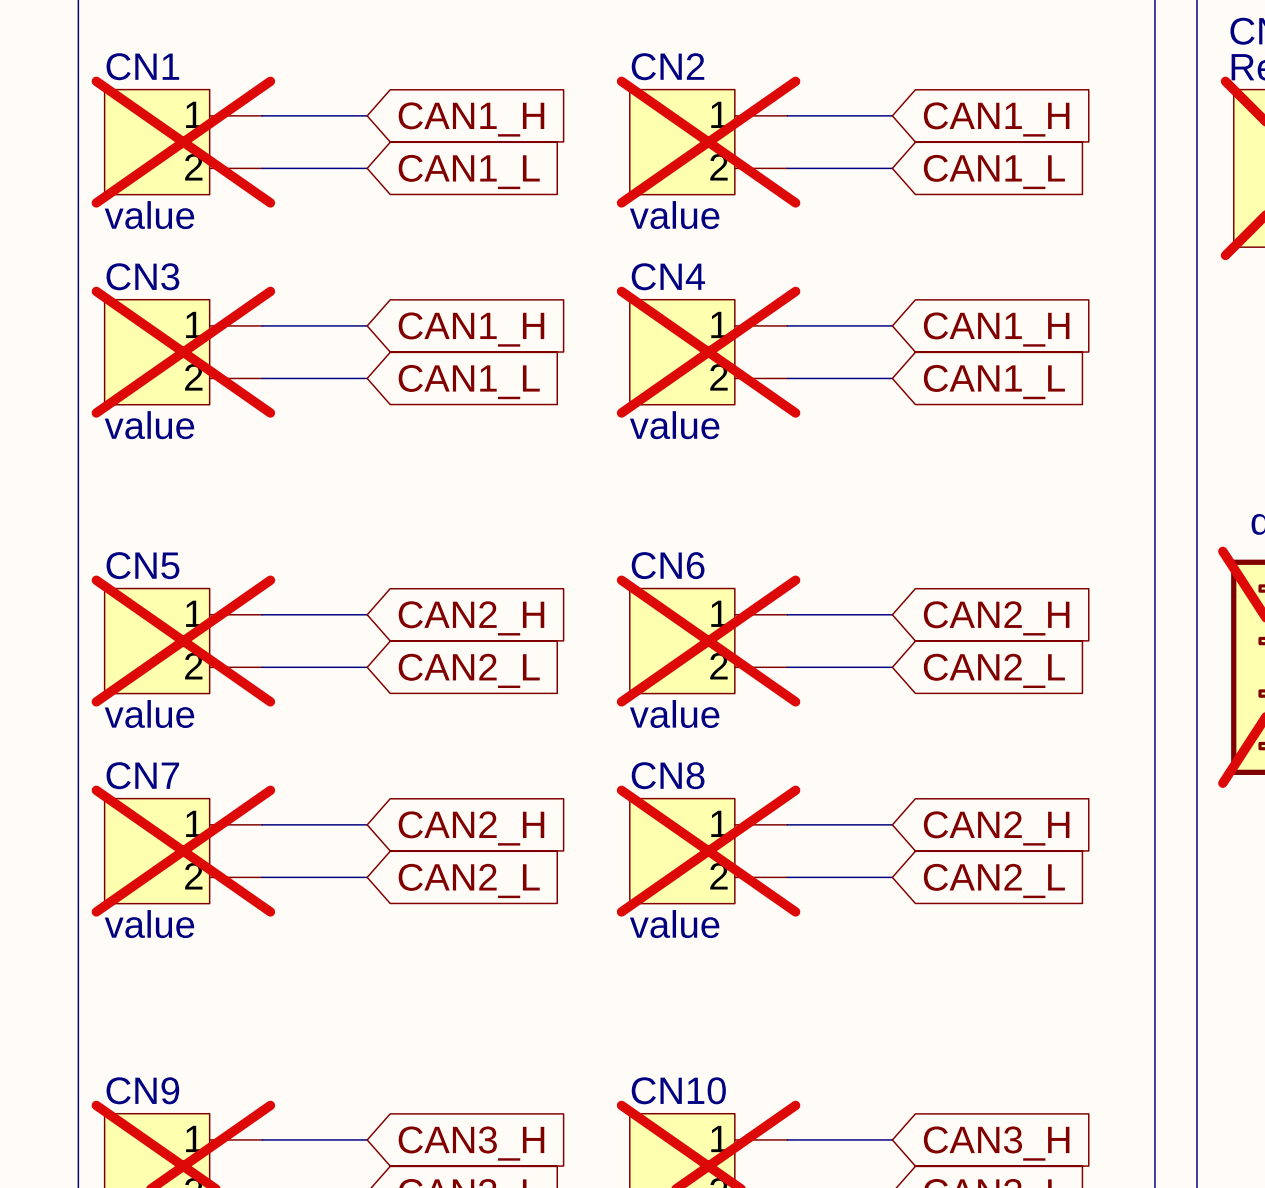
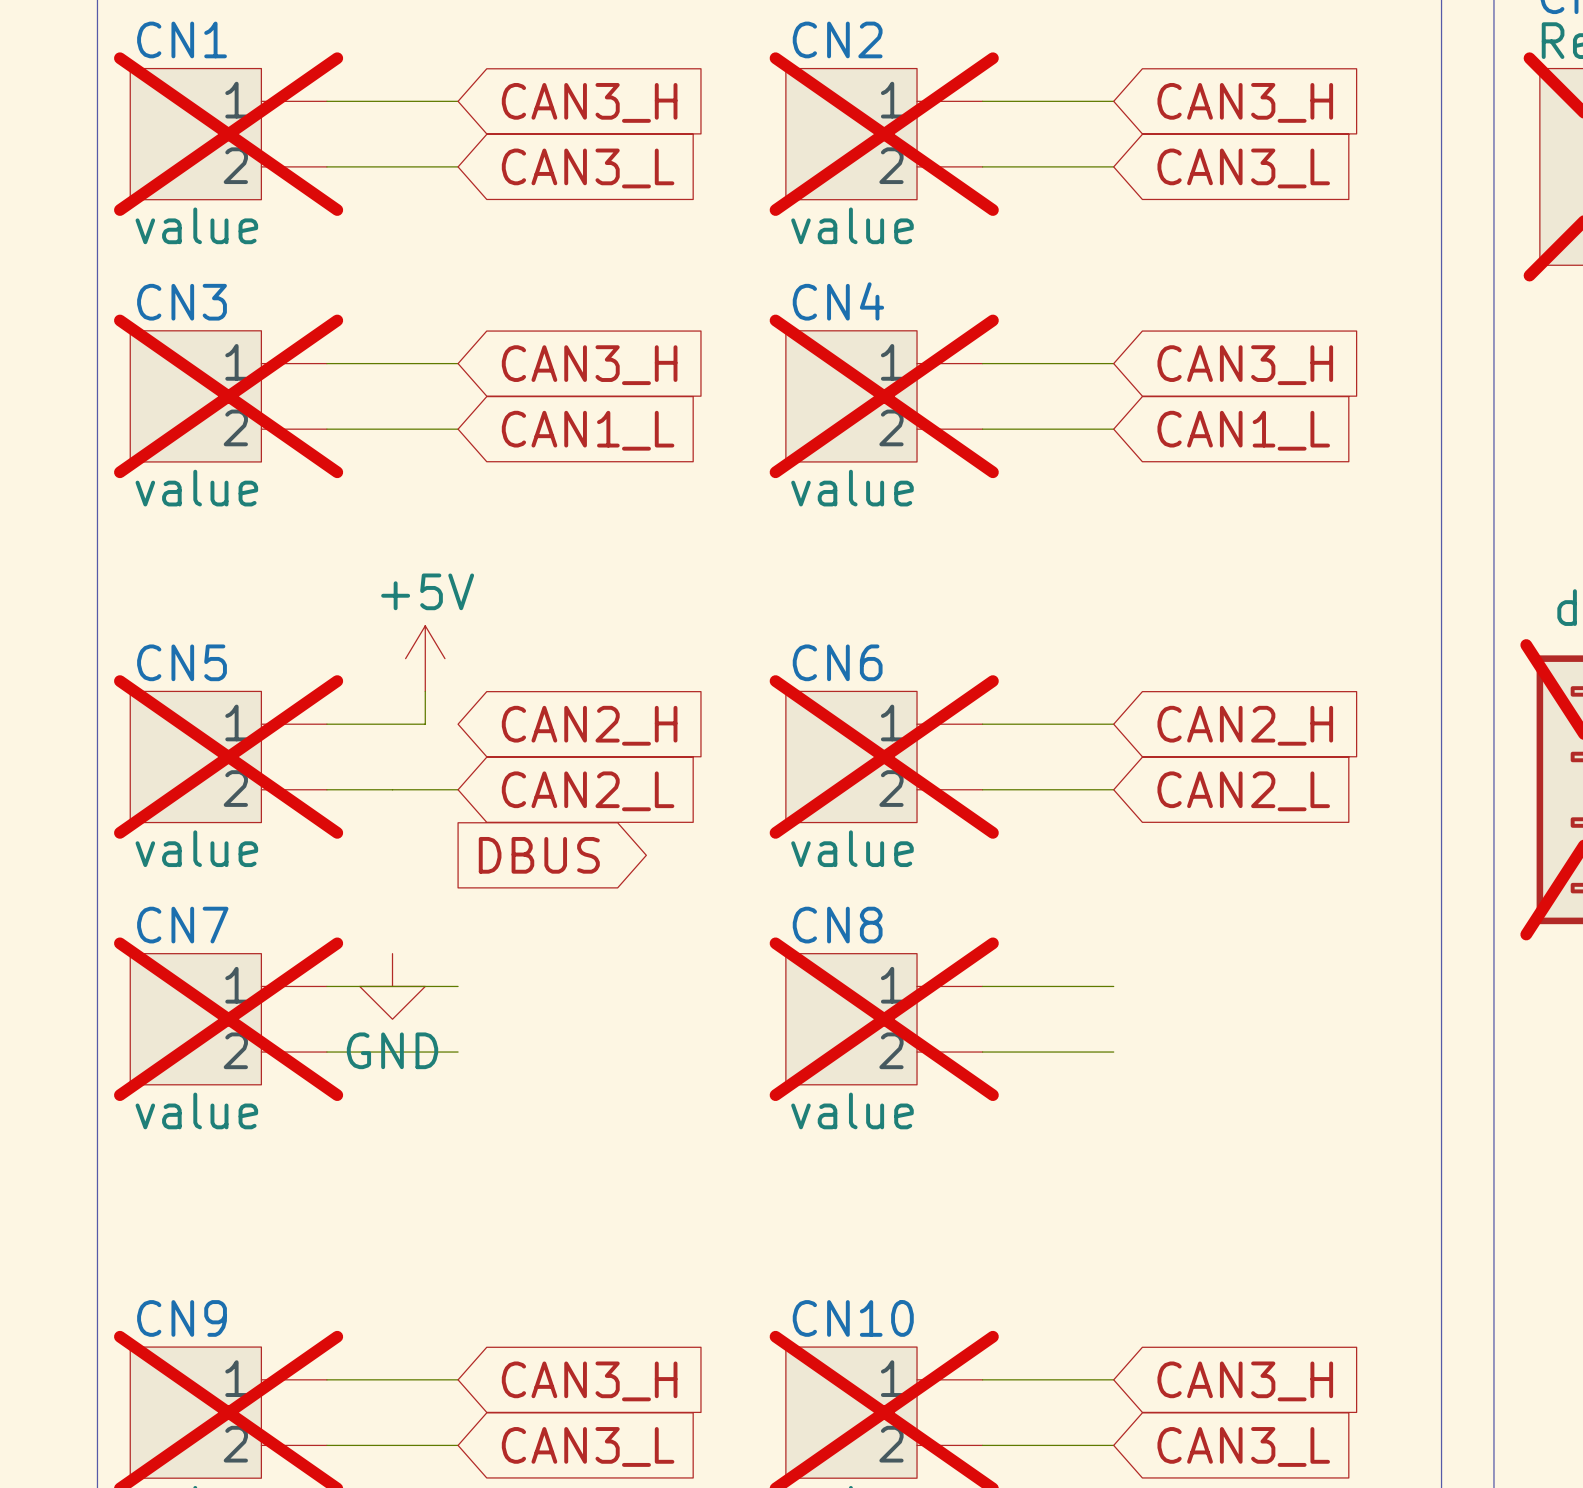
global label: CAN1_H (471, 119) -> CAN3_H (589, 102)
global label: CAN1_H (996, 119) -> CAN3_H (1245, 102)
global label: CAN1_L (469, 171) -> CAN3_L (588, 168)
global label: CAN1_L (994, 171) -> CAN3_L (1243, 168)
global label: CAN1_H (471, 329) -> CAN3_H (589, 365)
global label: CAN1_H (996, 329) -> CAN3_H (1245, 365)
power symbol: none -> +5V (425, 658)
wire: (340, 614) (367, 614) -> (425, 724) (425, 691)
global label: none -> DBUS (539, 855)
power symbol: none -> GND (392, 986)
global label: CAN2_H (471, 828) -> none
global label: CAN2_H (996, 828) -> none
global label: CAN2_L (469, 880) -> none
global label: CAN2_L (994, 880) -> none

